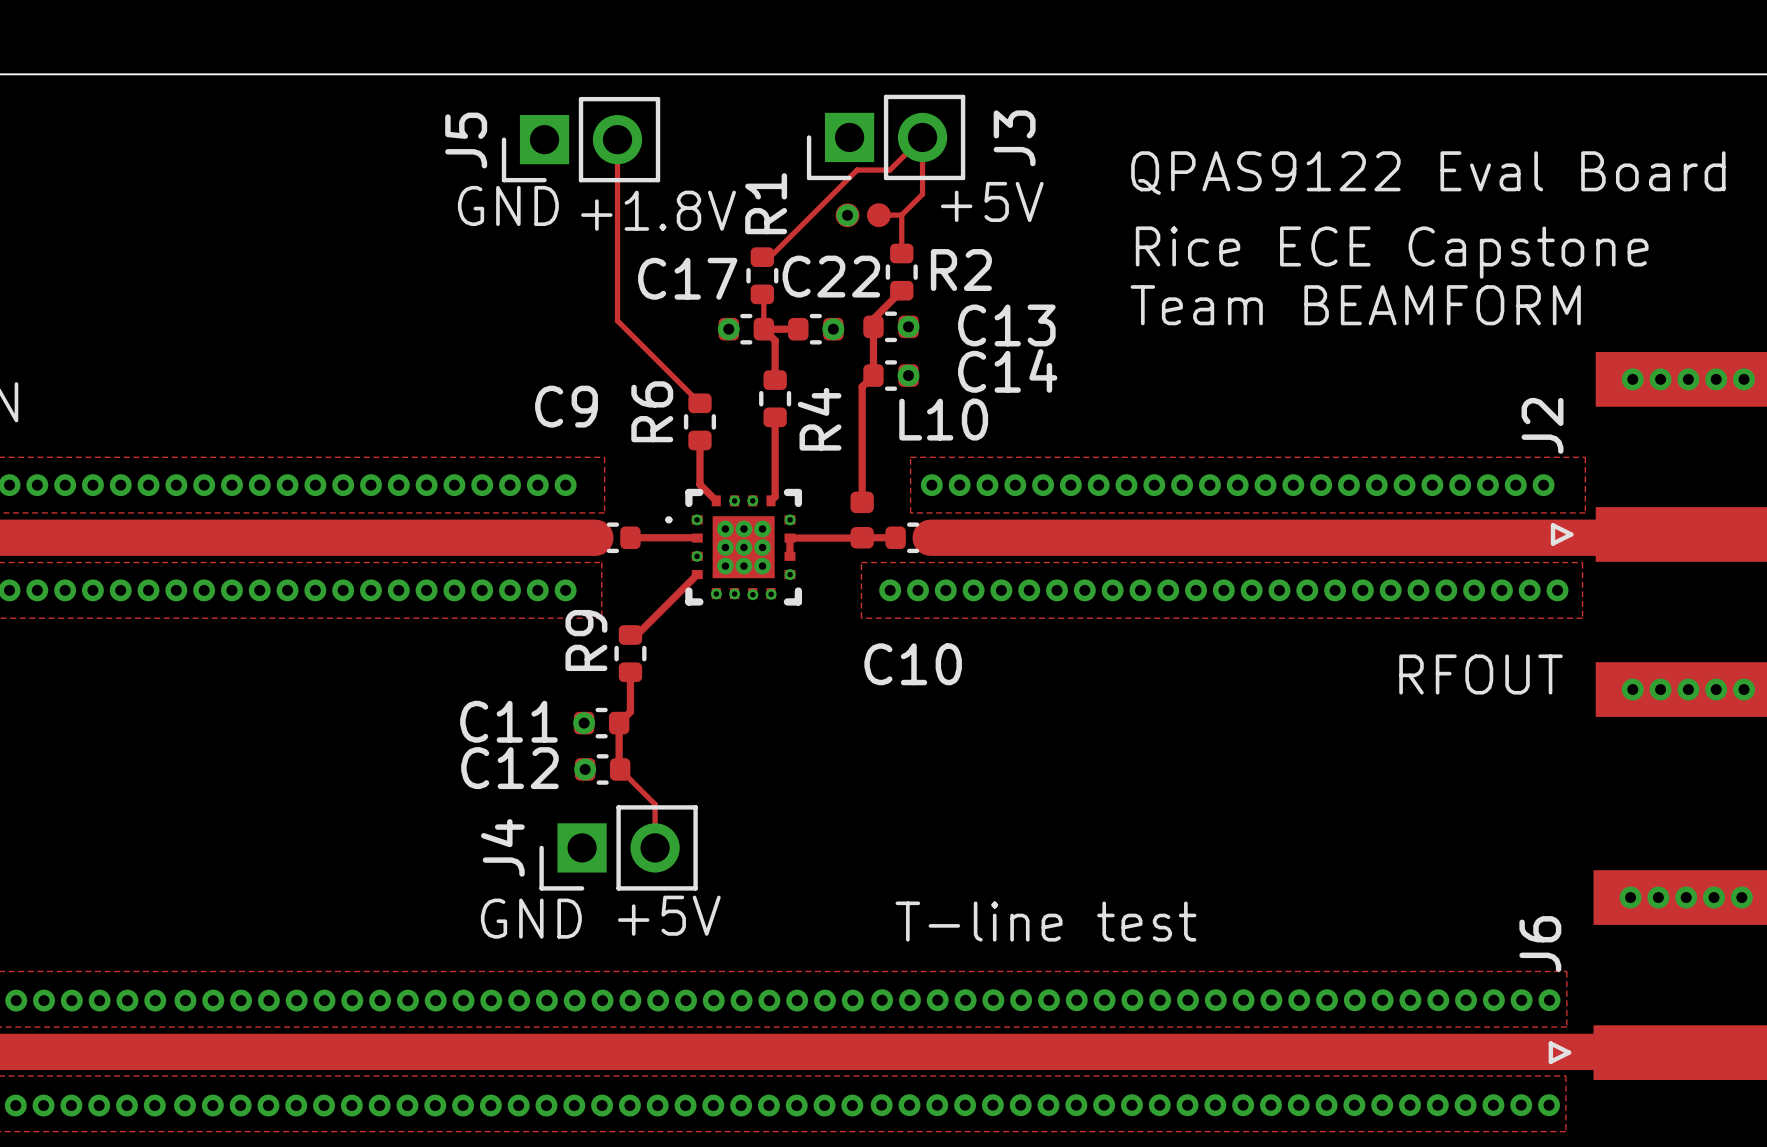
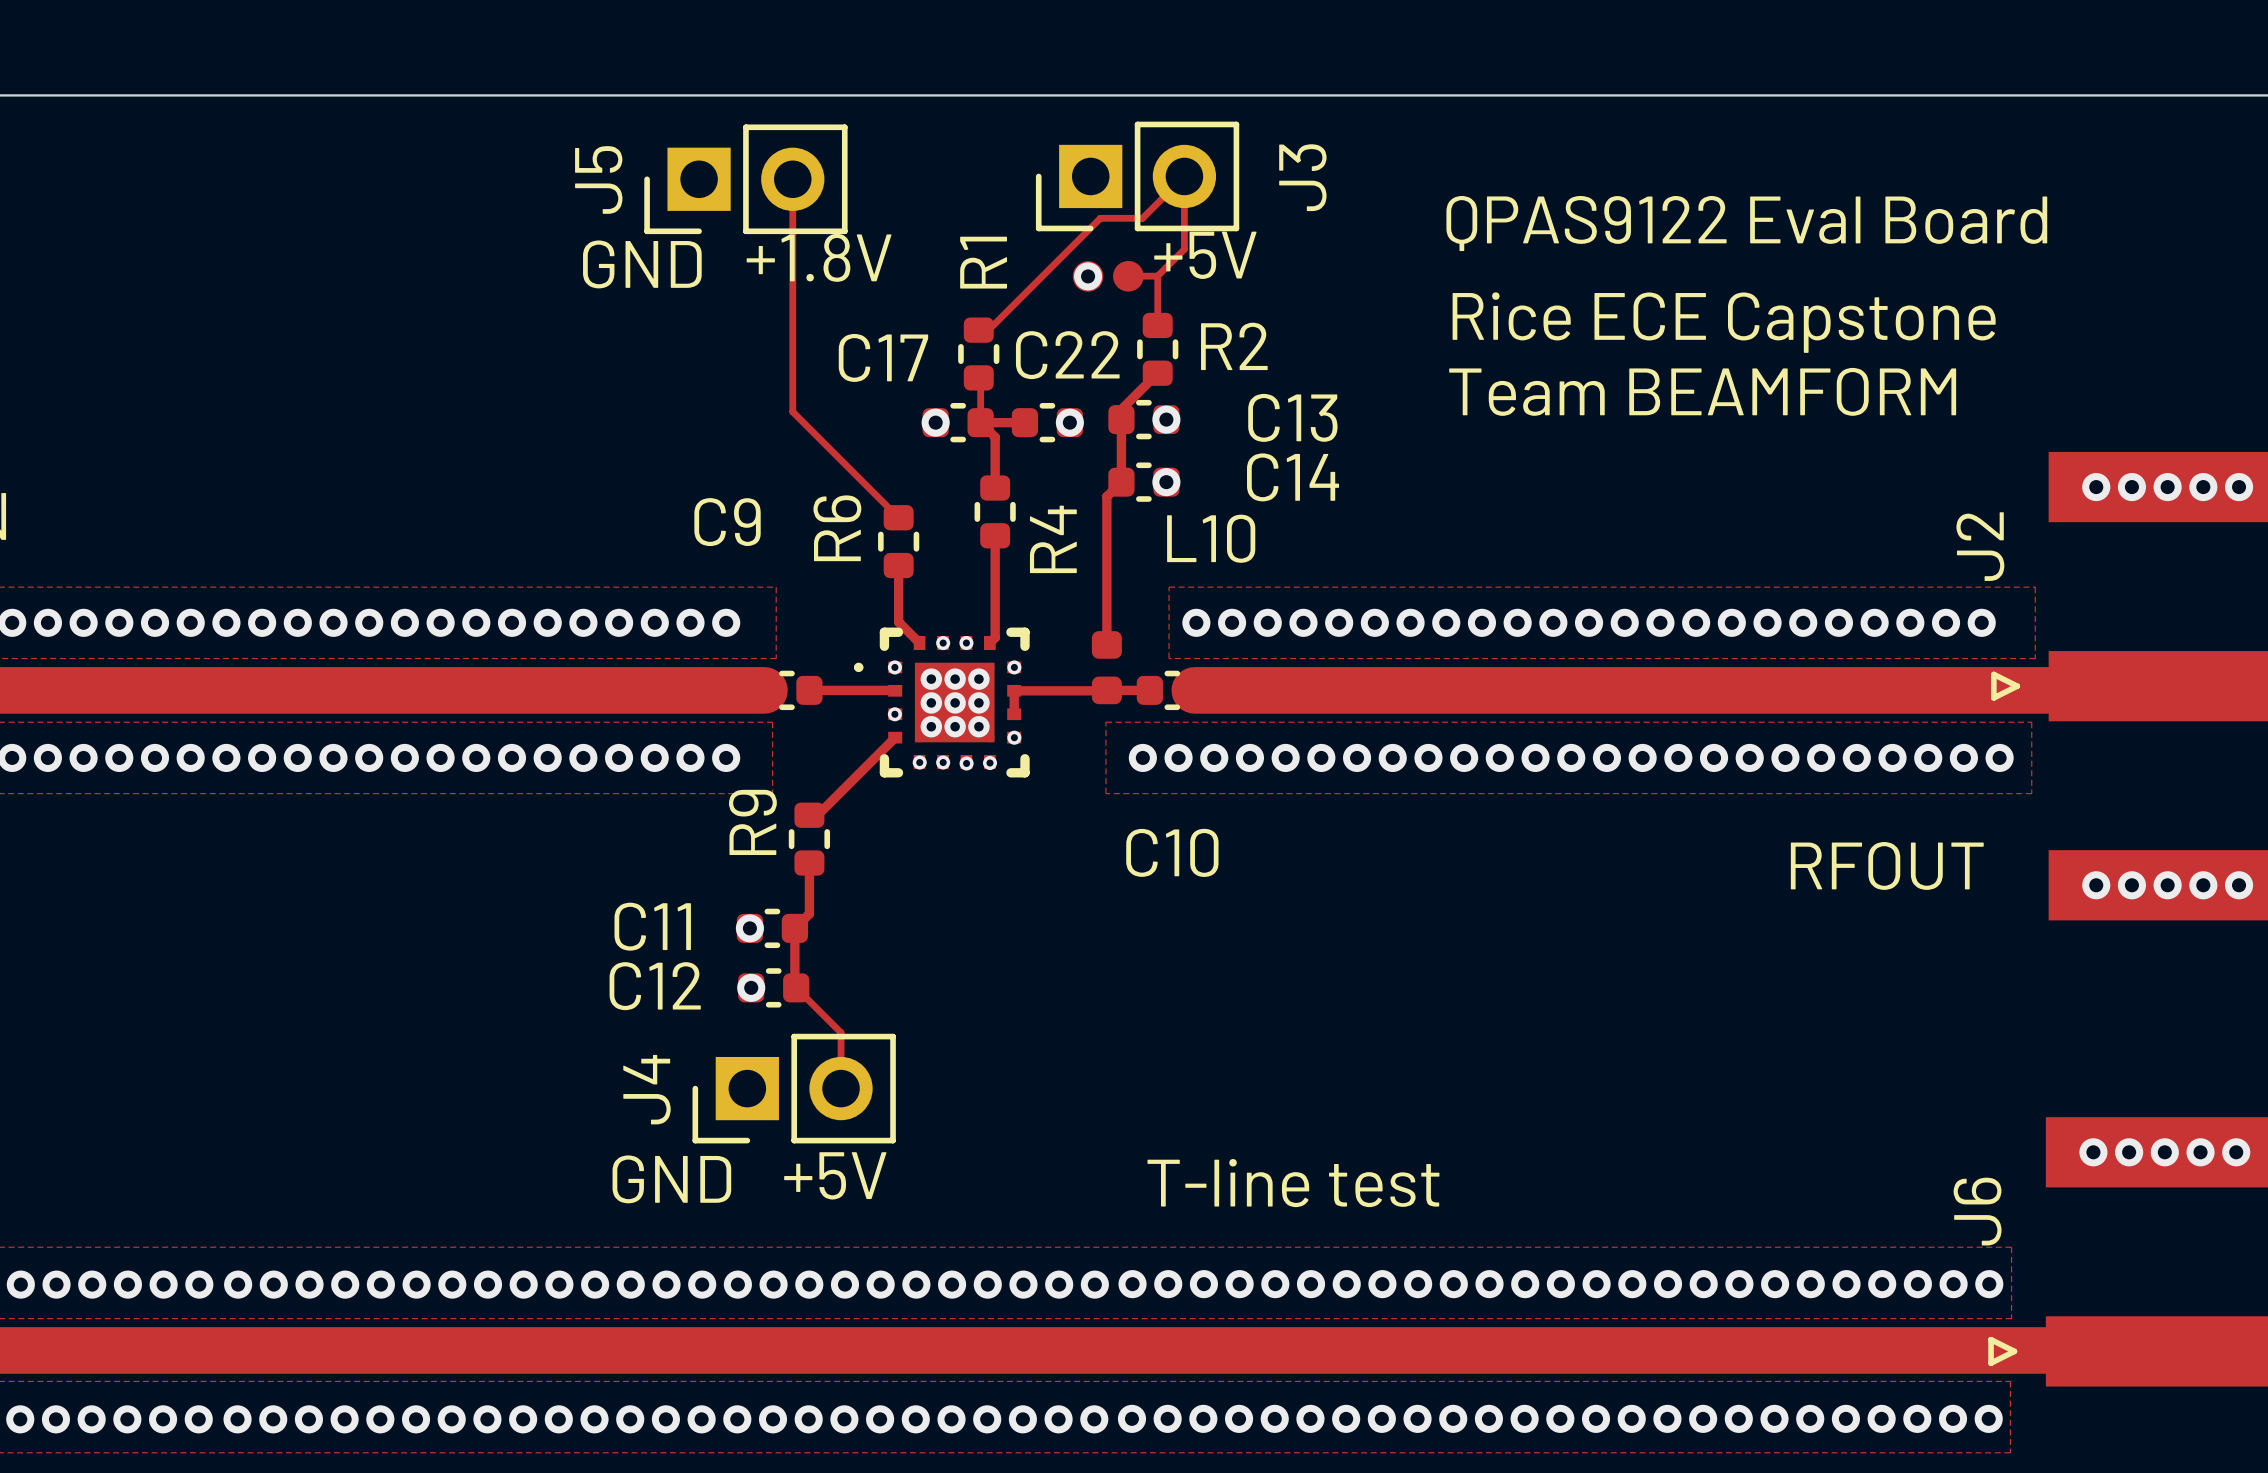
text position: +5V (992, 201) -> +5V (1205, 255)
text position: +1.8V (658, 210) -> +1.8V (819, 257)

